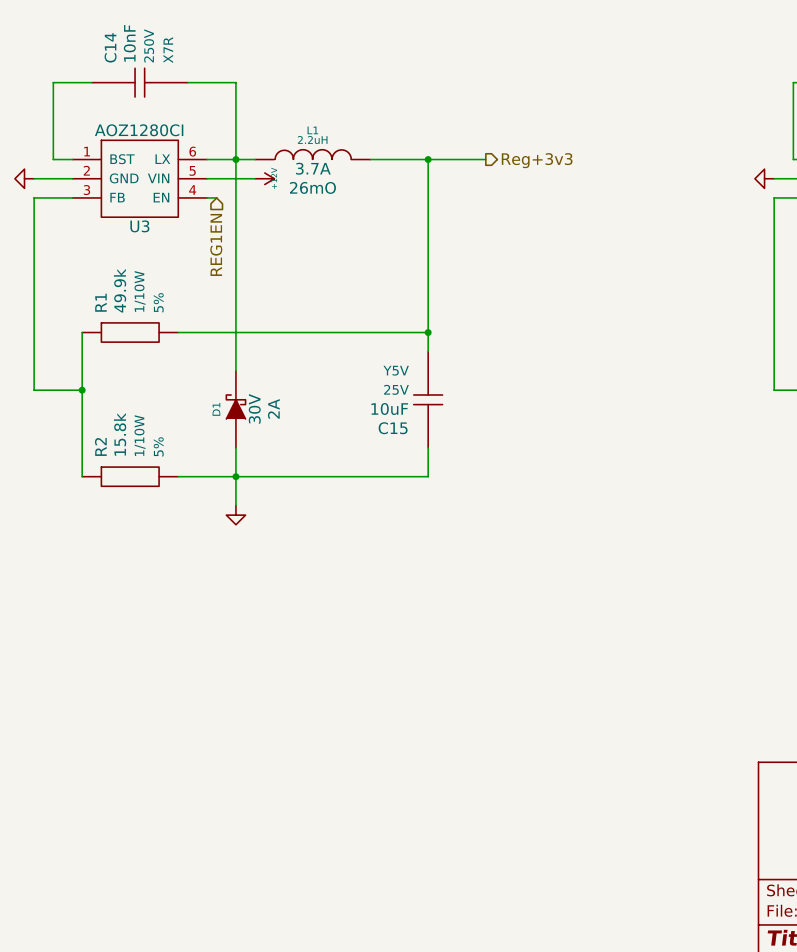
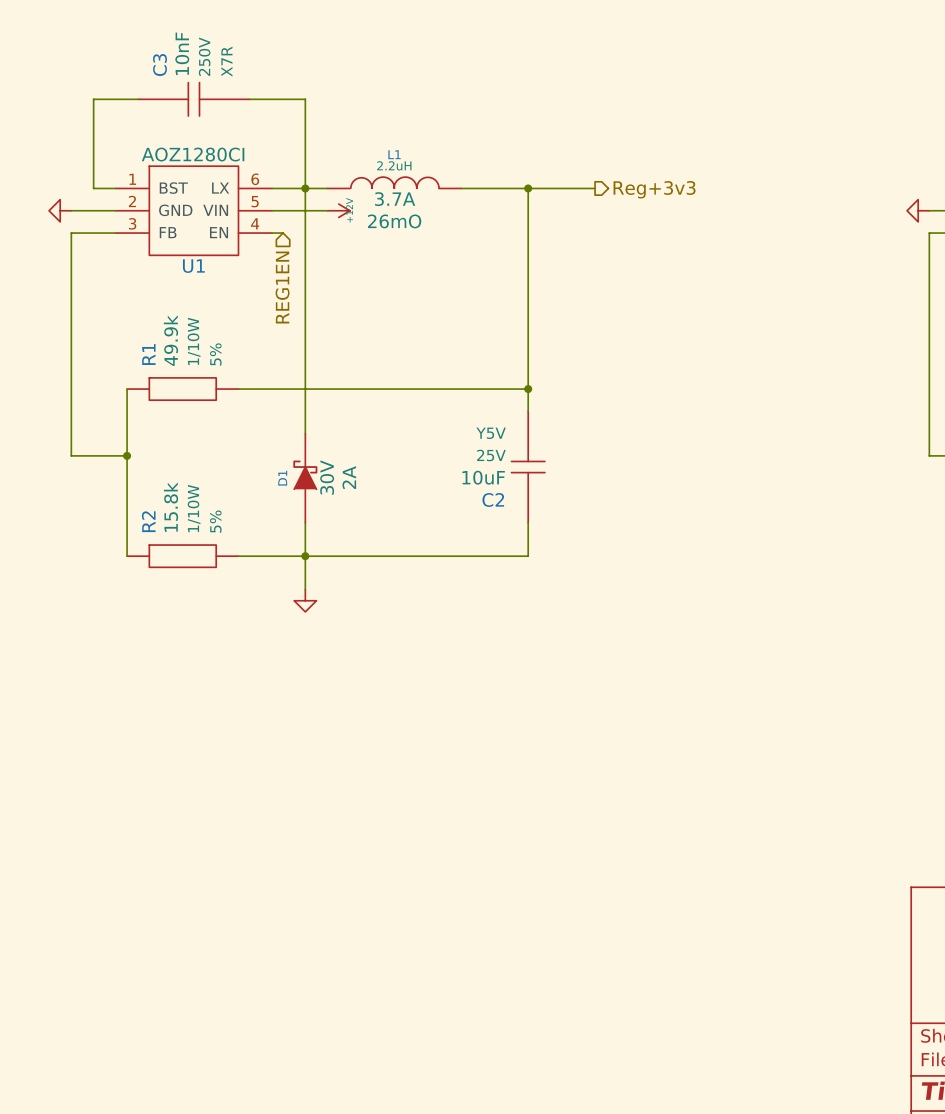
C14 name: C14 (110, 47) -> C3 (159, 65)
U3 name: U3 (139, 226) -> U1 (193, 266)
C15 name: C15 (393, 428) -> C2 (493, 499)

